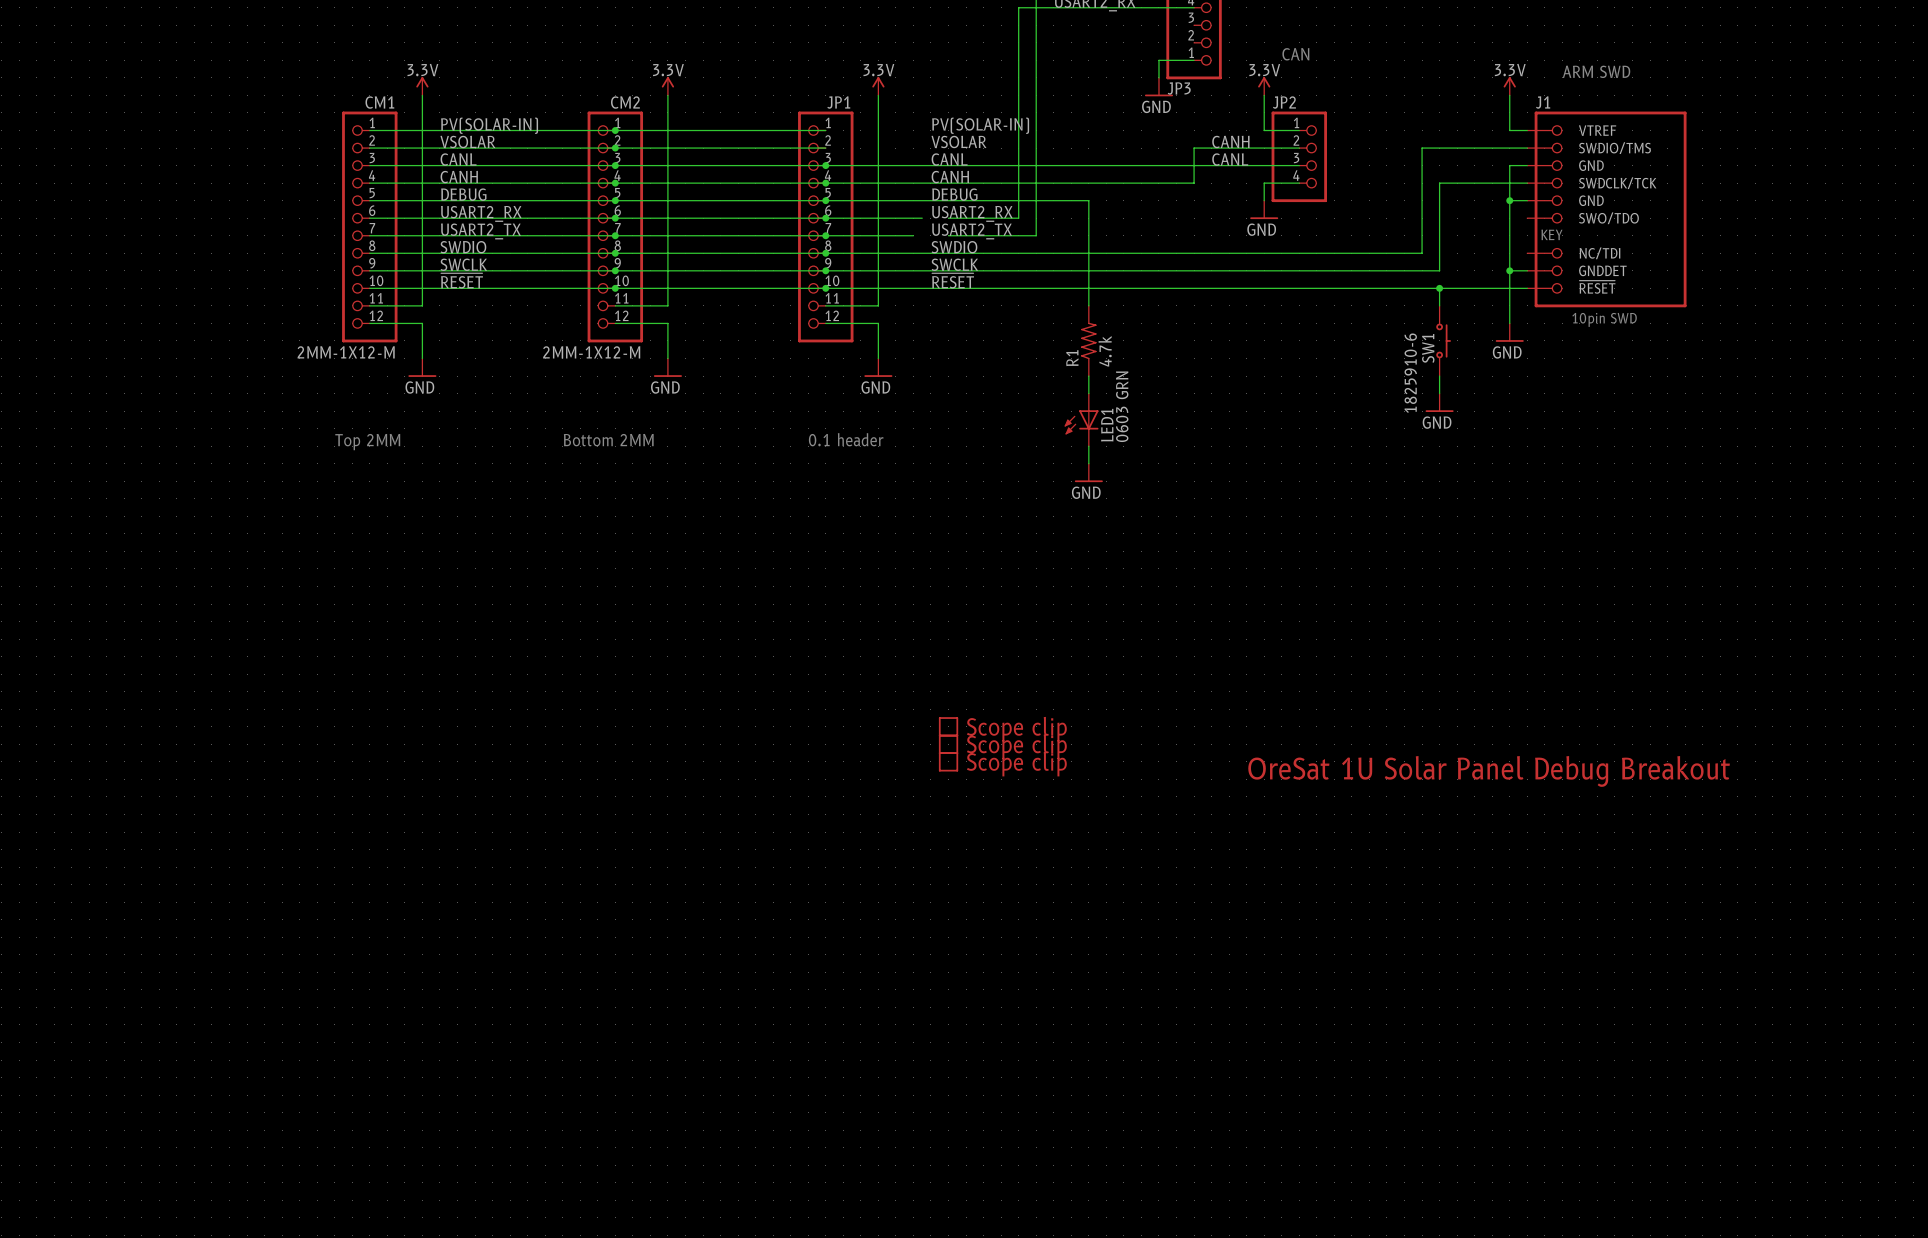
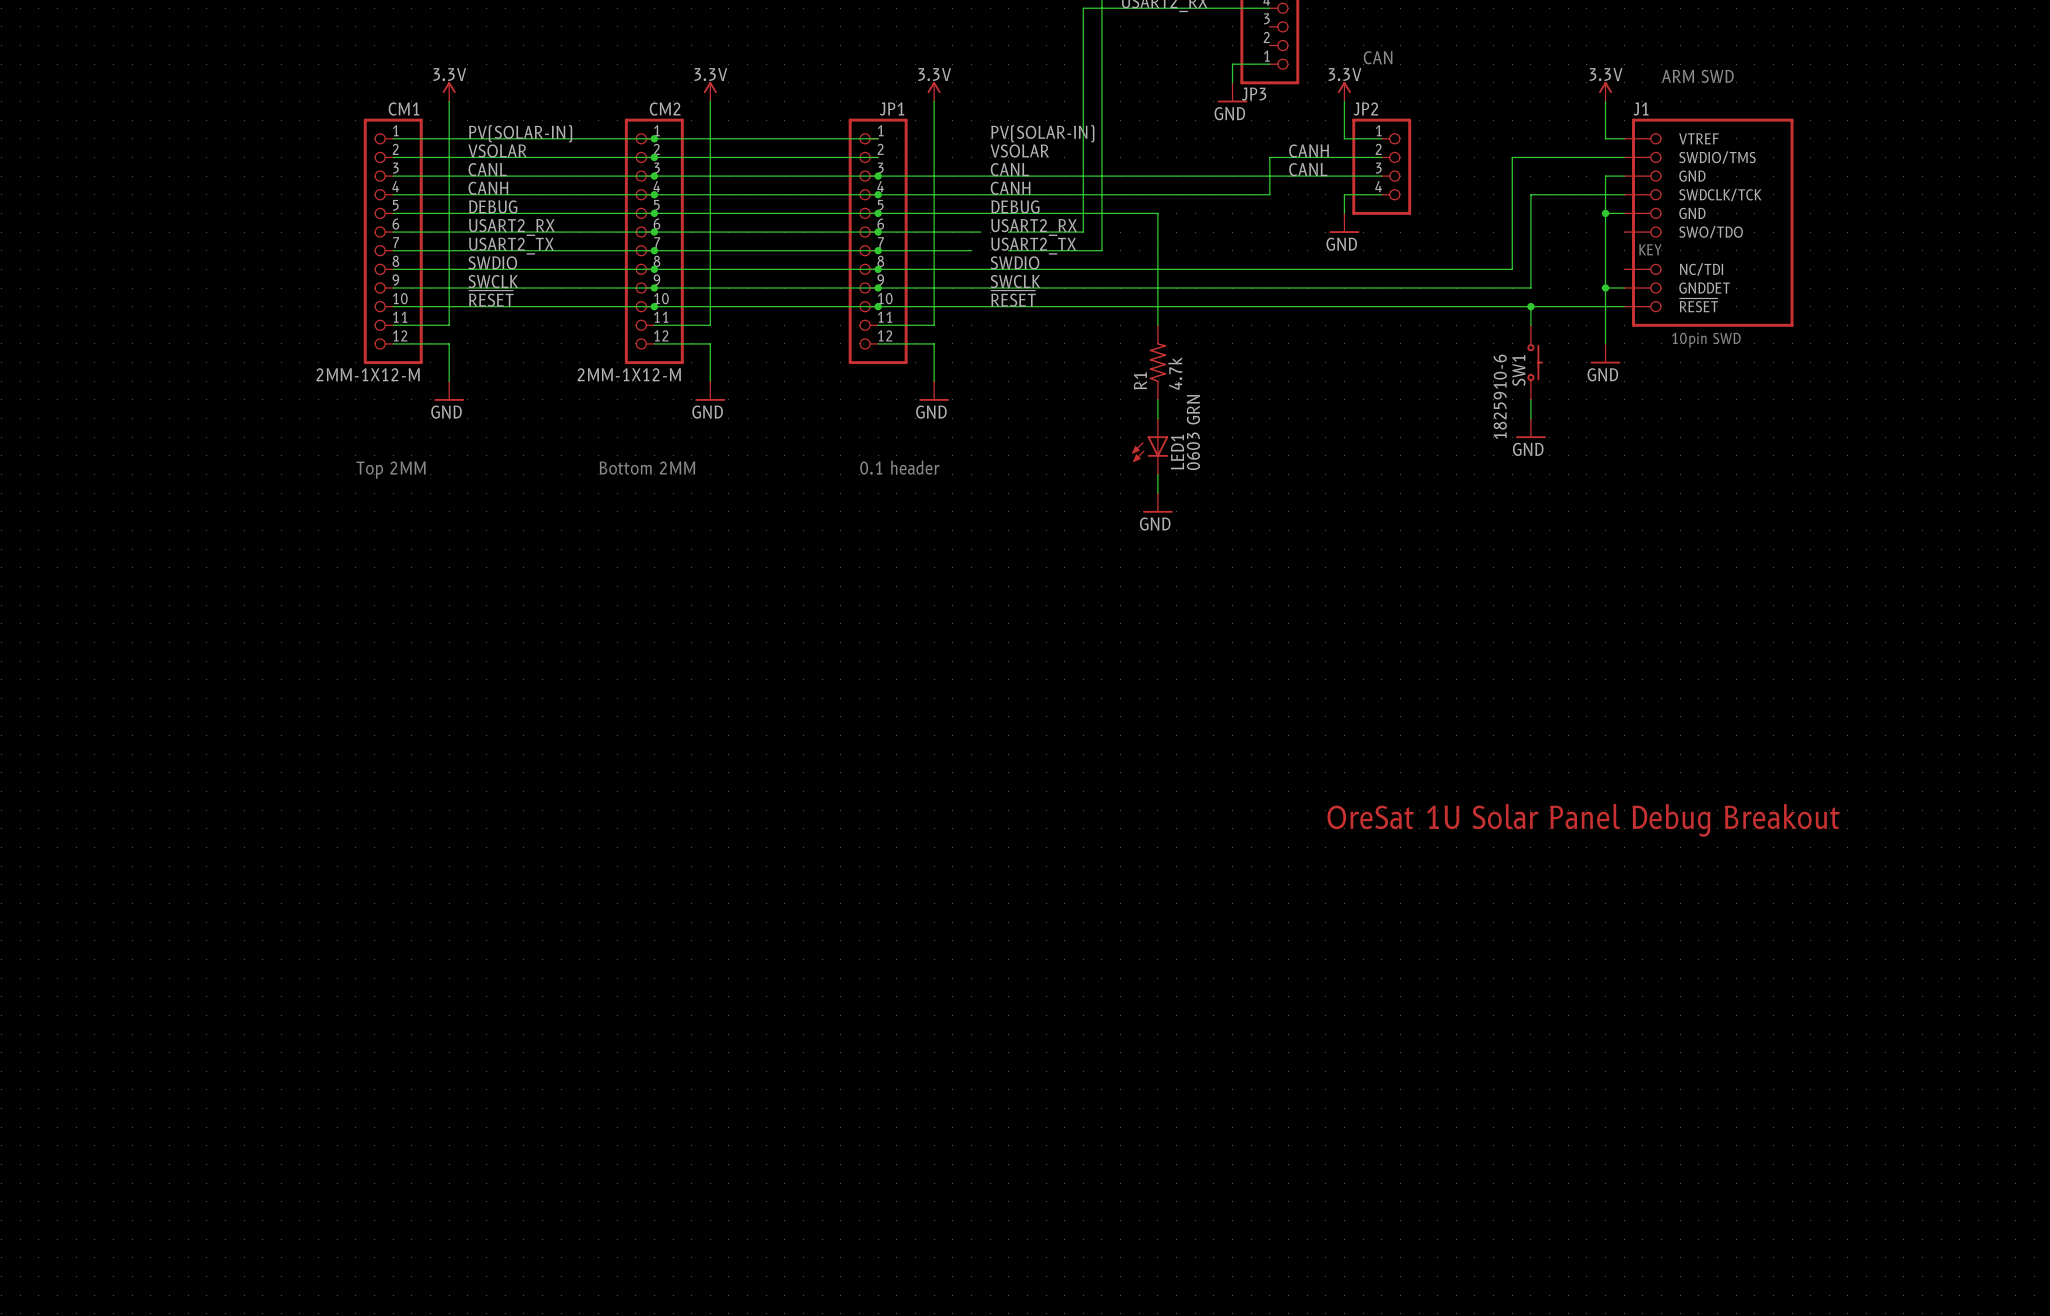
part: (948, 726) -> none
part: (948, 744) -> none
part: (948, 761) -> none

